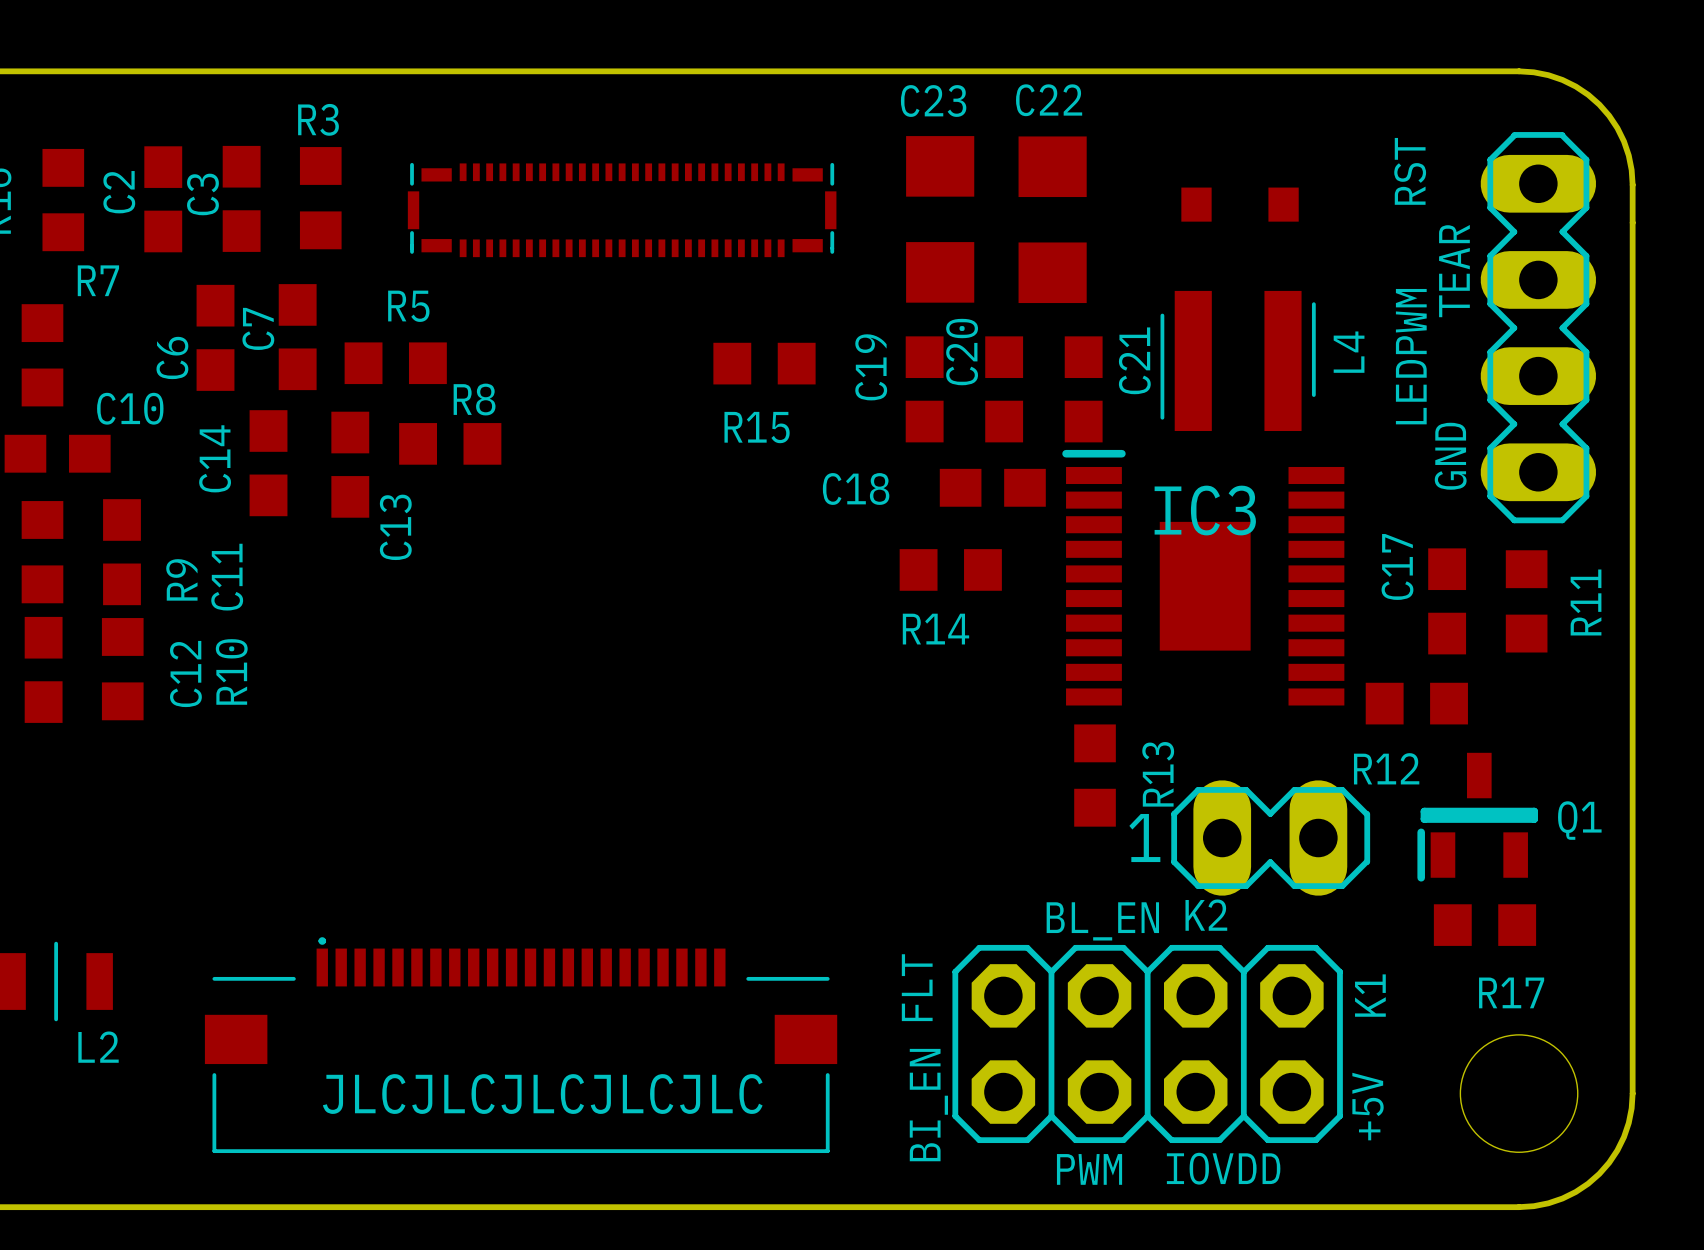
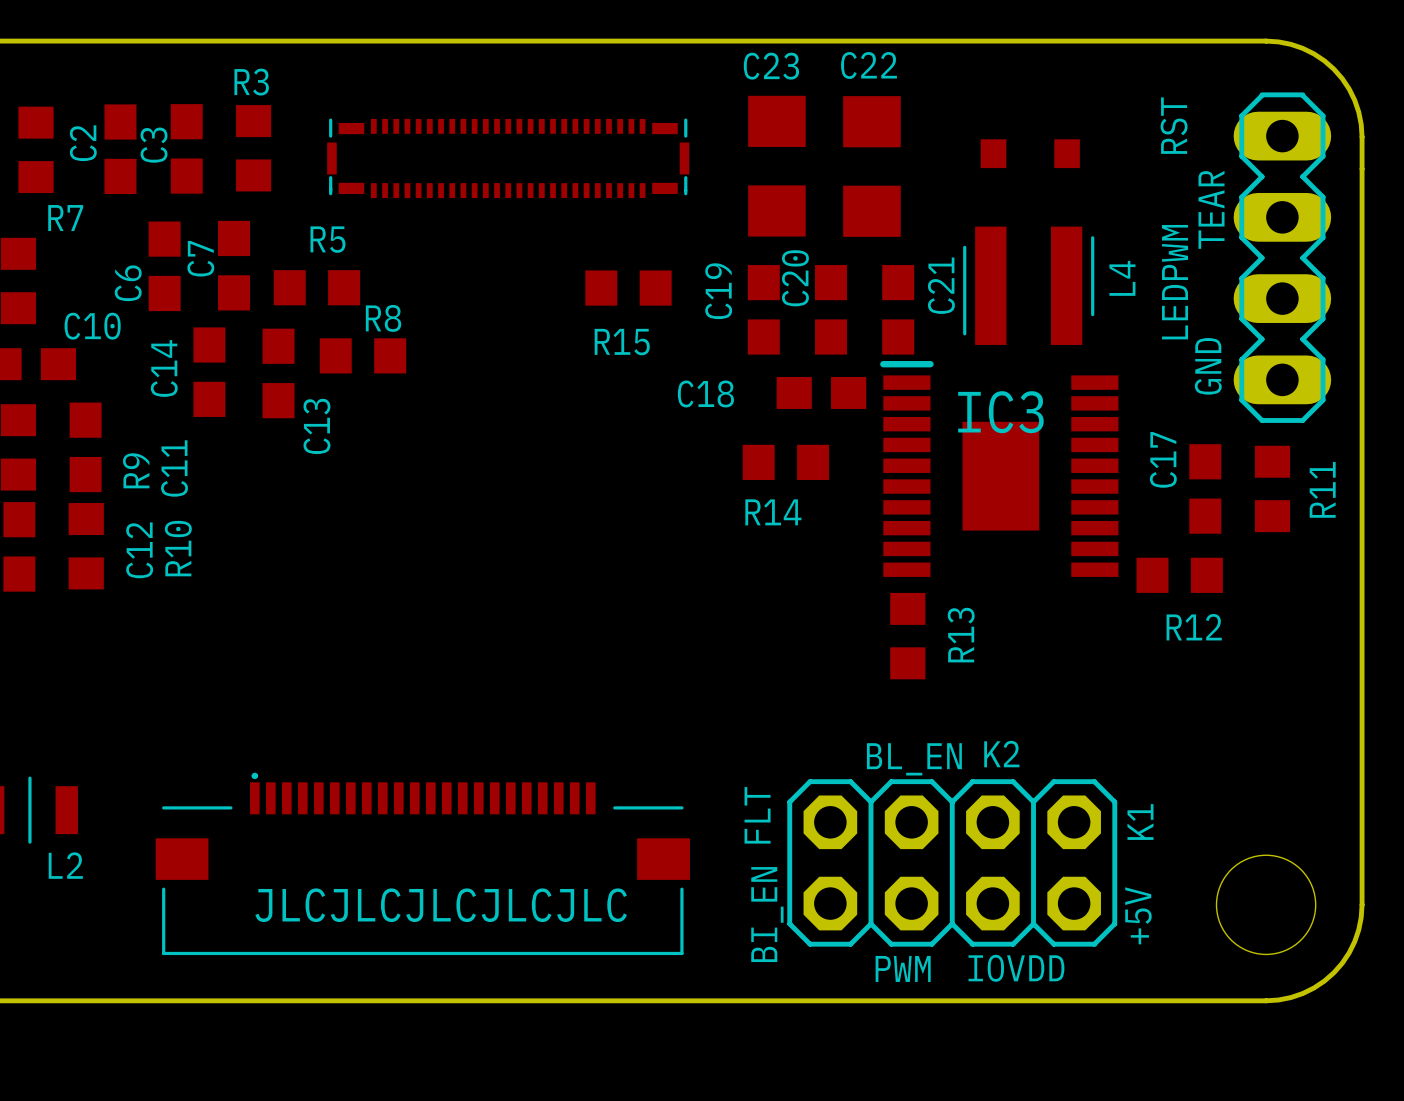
R12 name position: R12 (1386, 768) -> R12 (1194, 627)
Q1: (1477, 817) -> none
part: (1270, 838) -> none
R17: (1484, 925) -> none

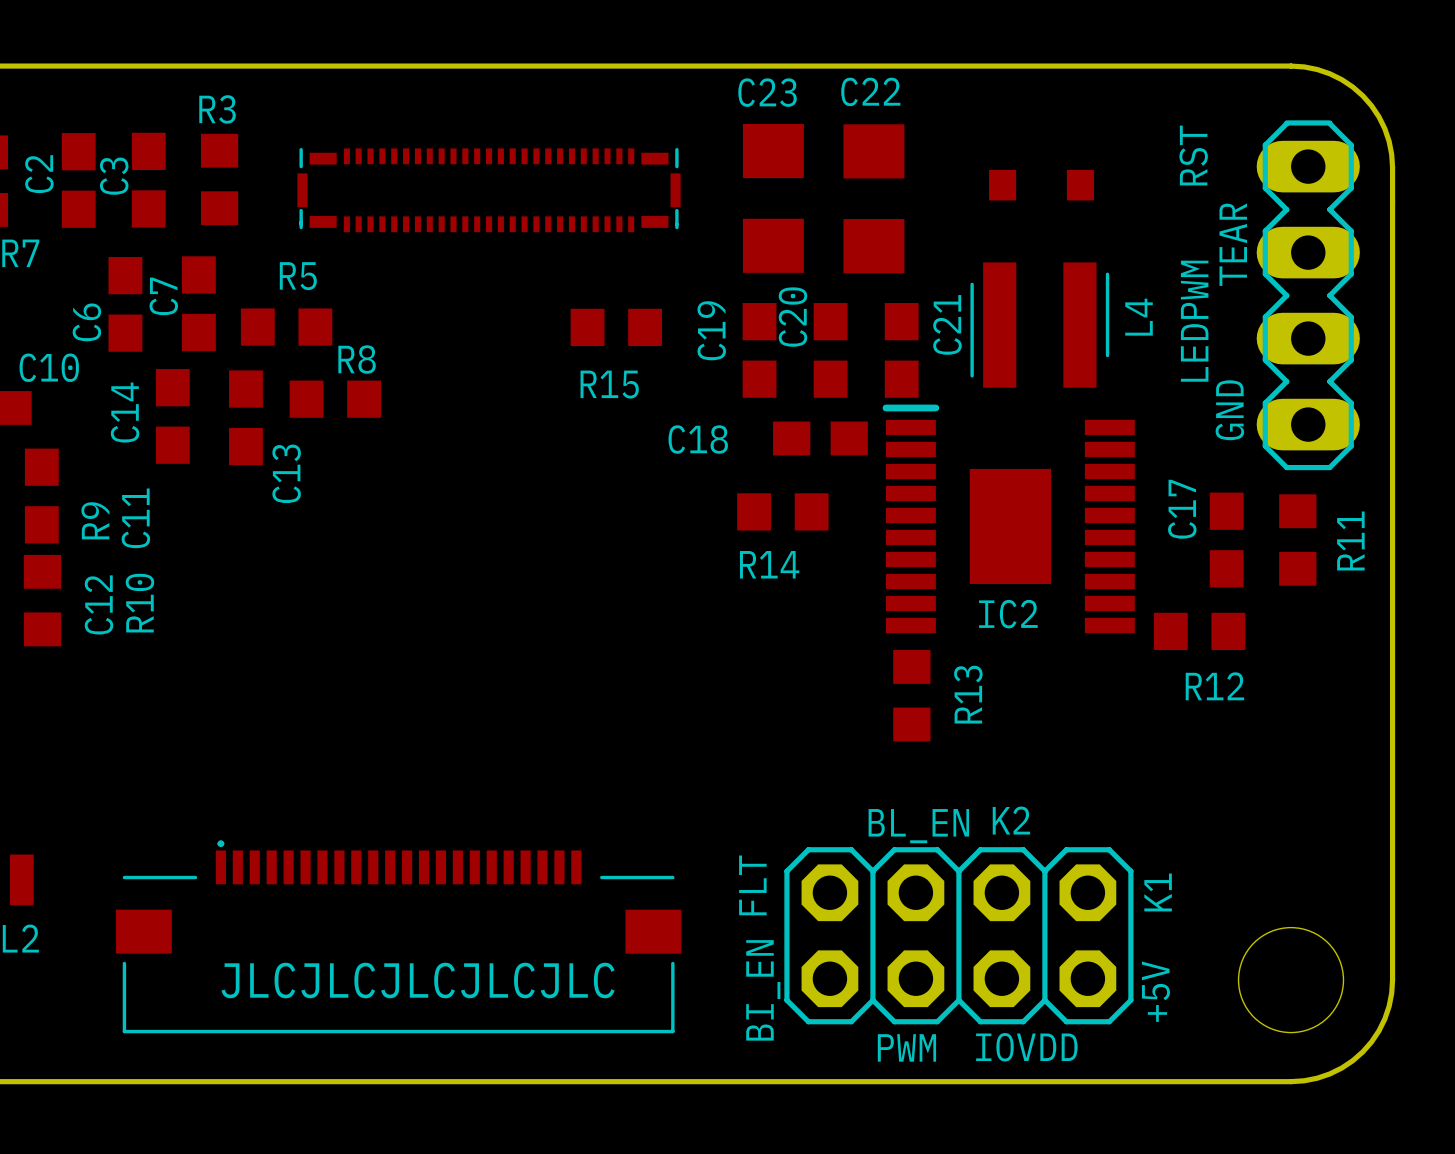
IC3 name: IC3 (1000, 412) -> IC2 (1008, 614)

